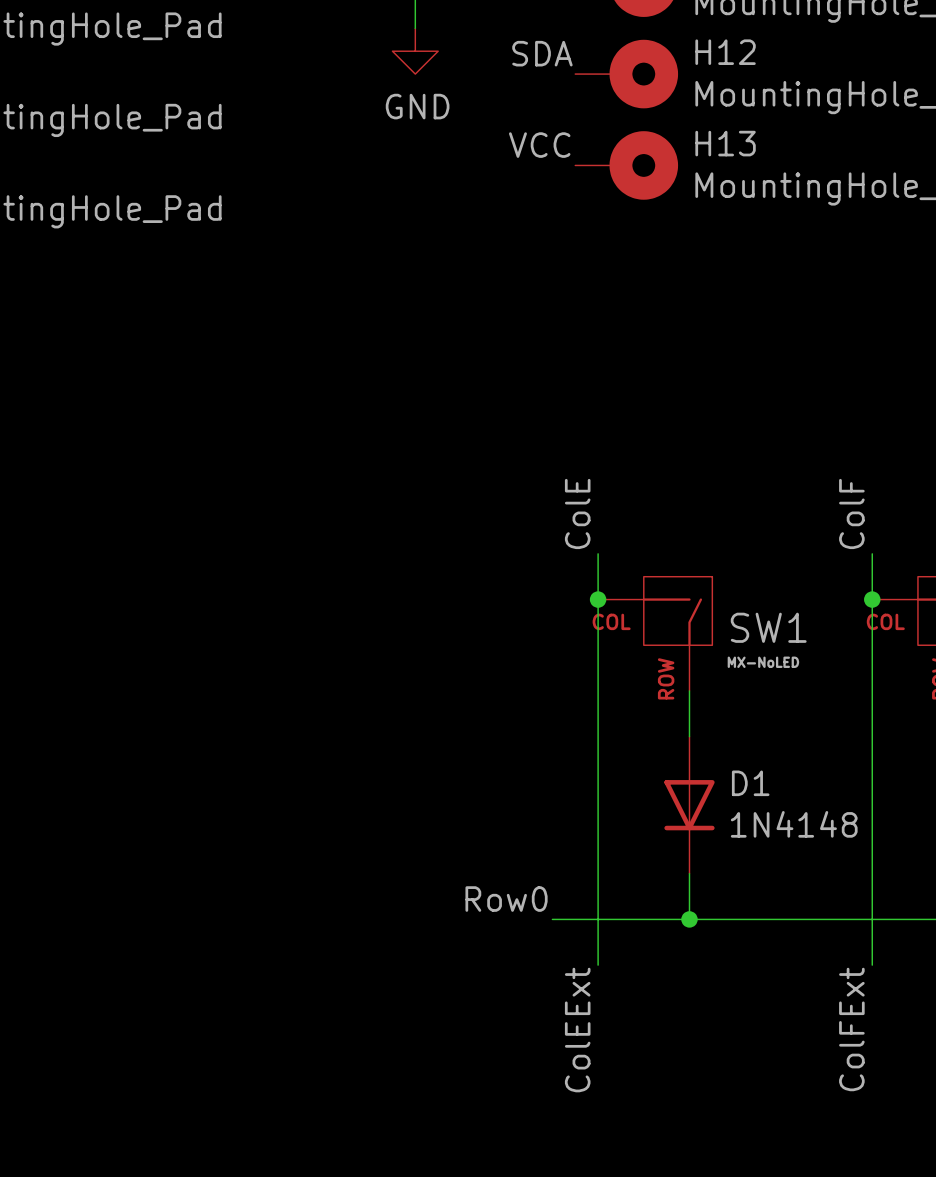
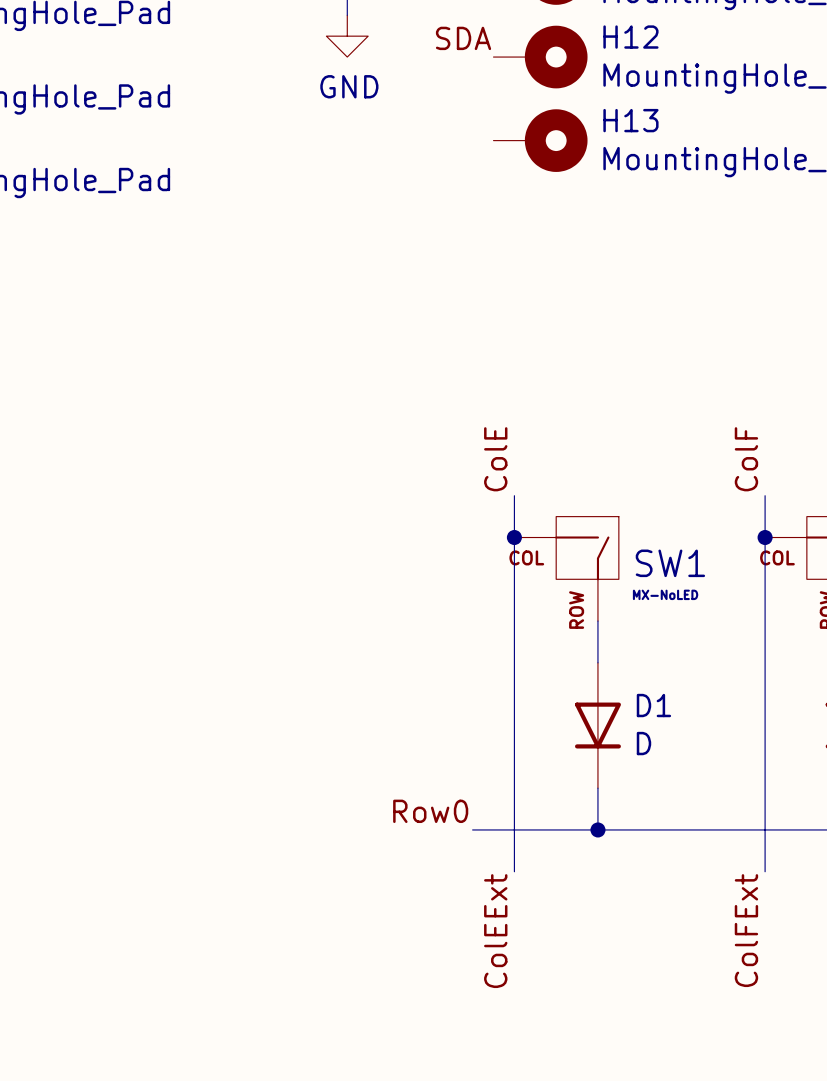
label: VCC (539, 145) -> none
D1 value: 1N4148 (794, 824) -> D (643, 743)

